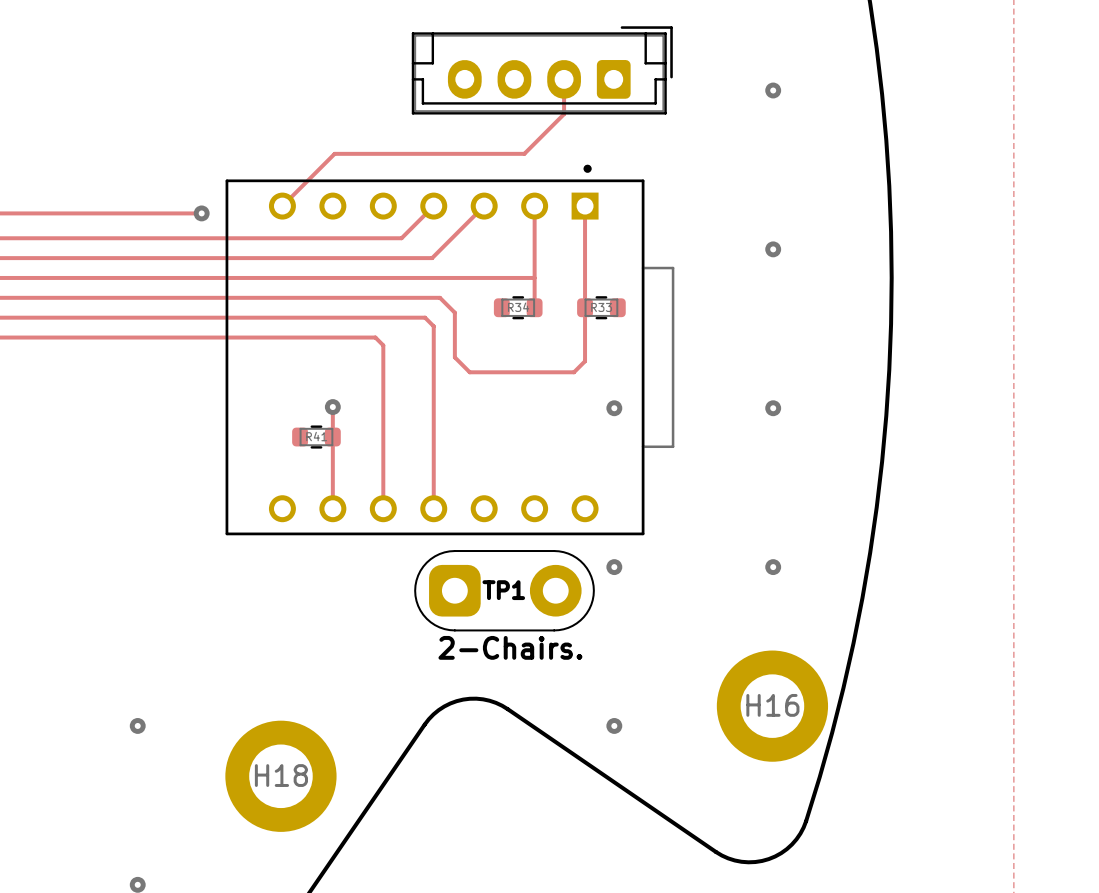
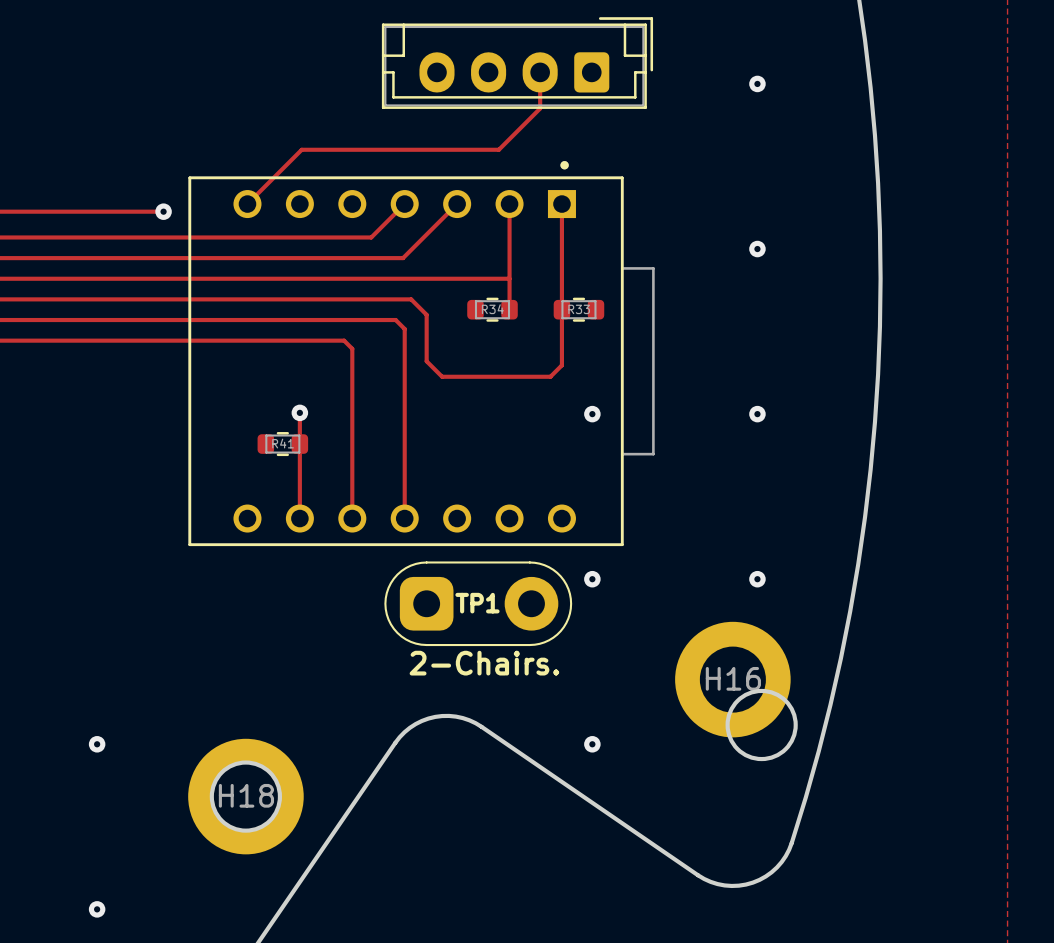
round board edge: none -> [725, 688, 798, 762]
H16 position: (772, 706) -> (732, 679)
round board edge: none -> [209, 760, 282, 833]

